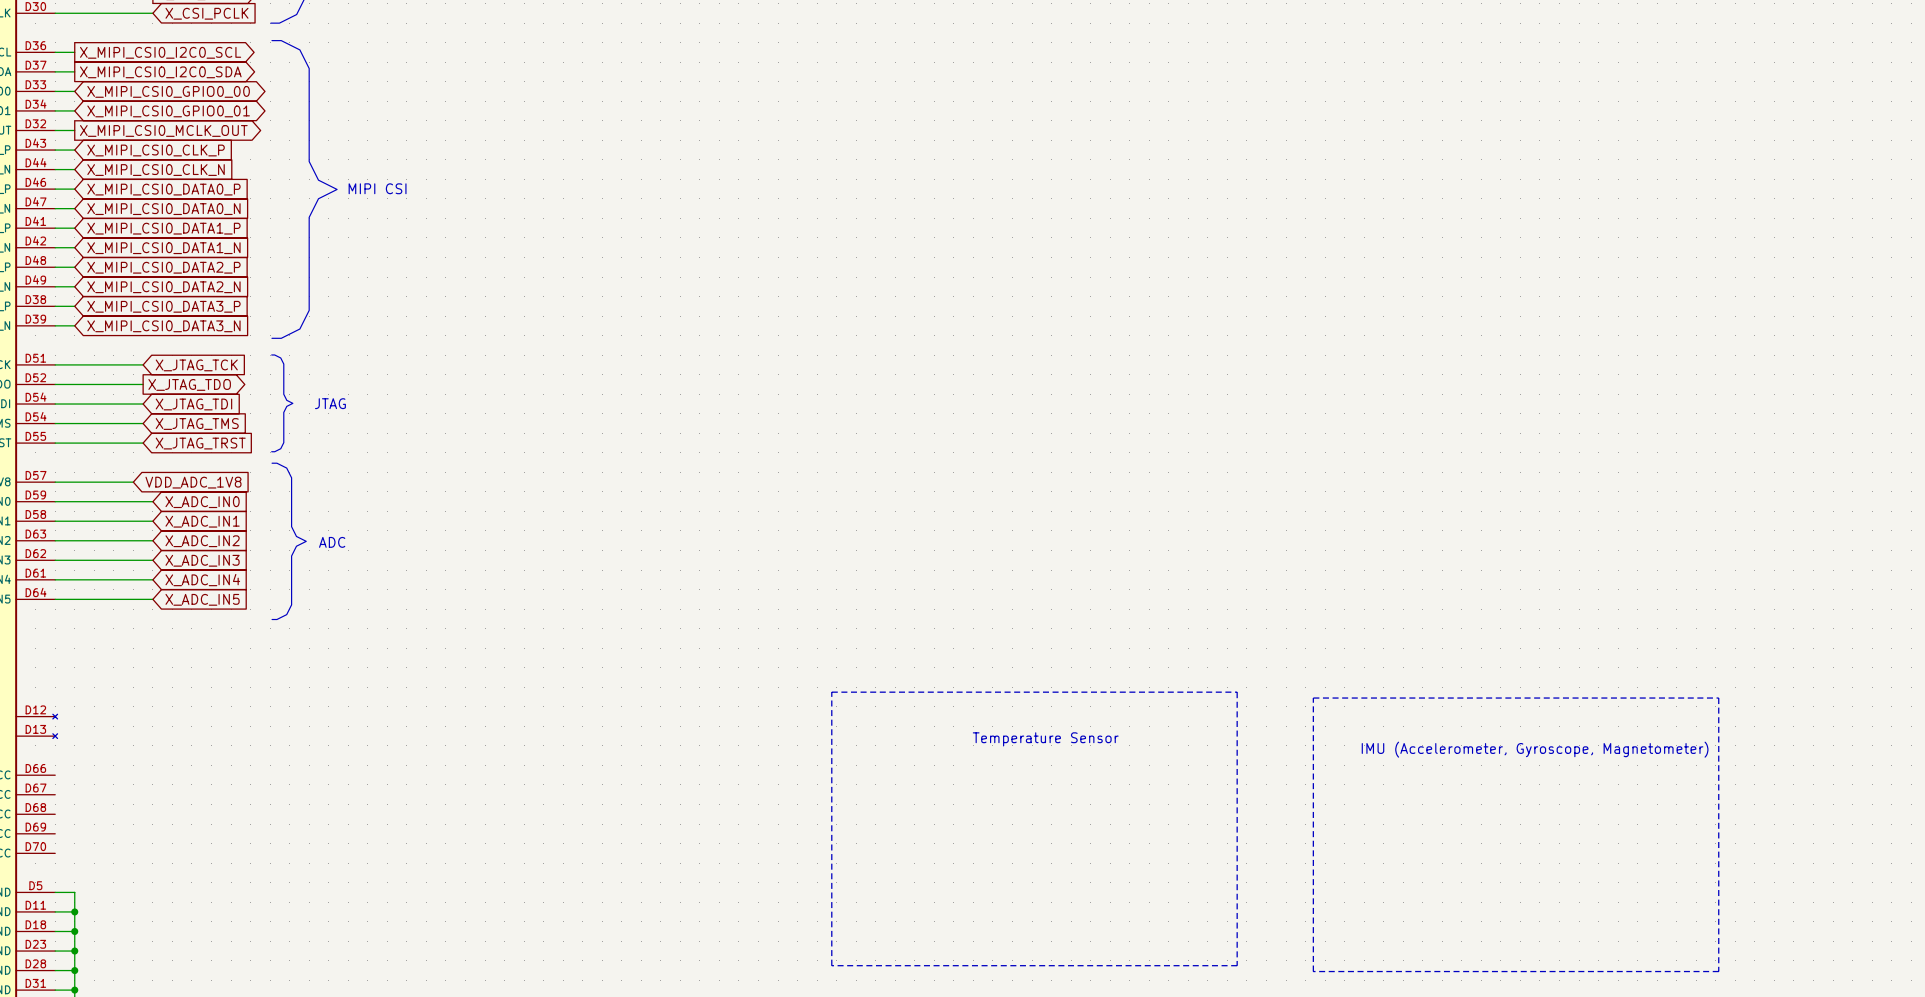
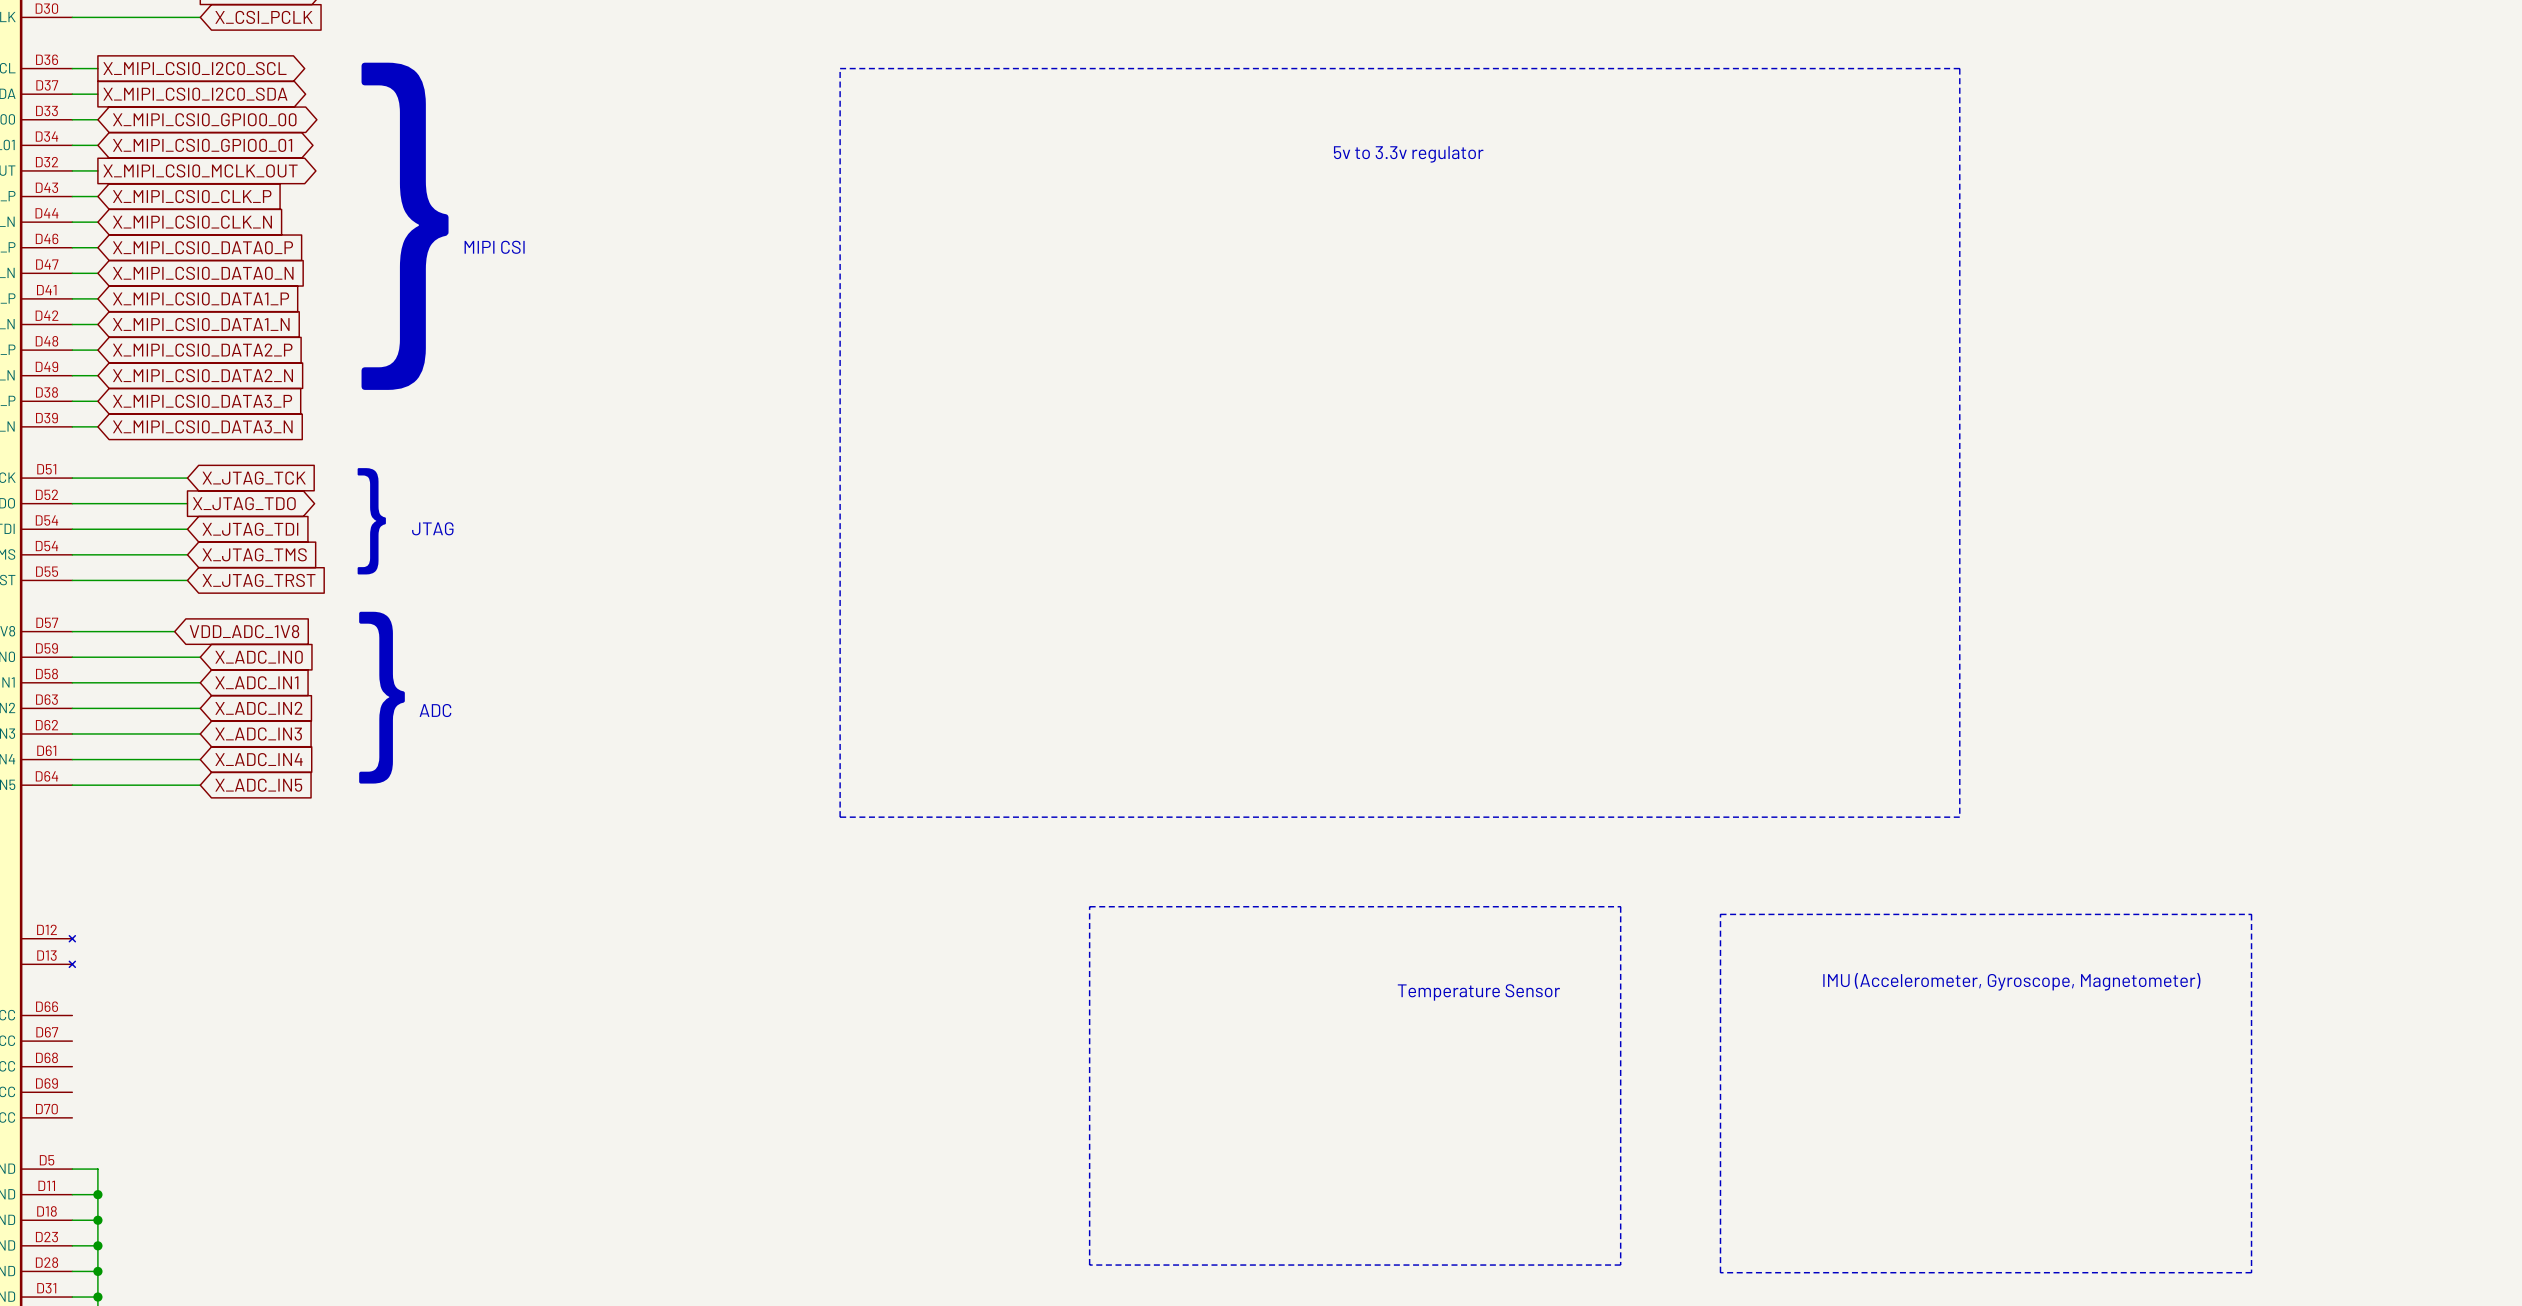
line: none -> (840, 68) (1959, 68) (1959, 817) (840, 817) (840, 68)
text: none -> 5v to 3.3v regulator (1408, 154)
text position: Temperature Sensor (1045, 739) -> Temperature Sensor (1478, 992)

